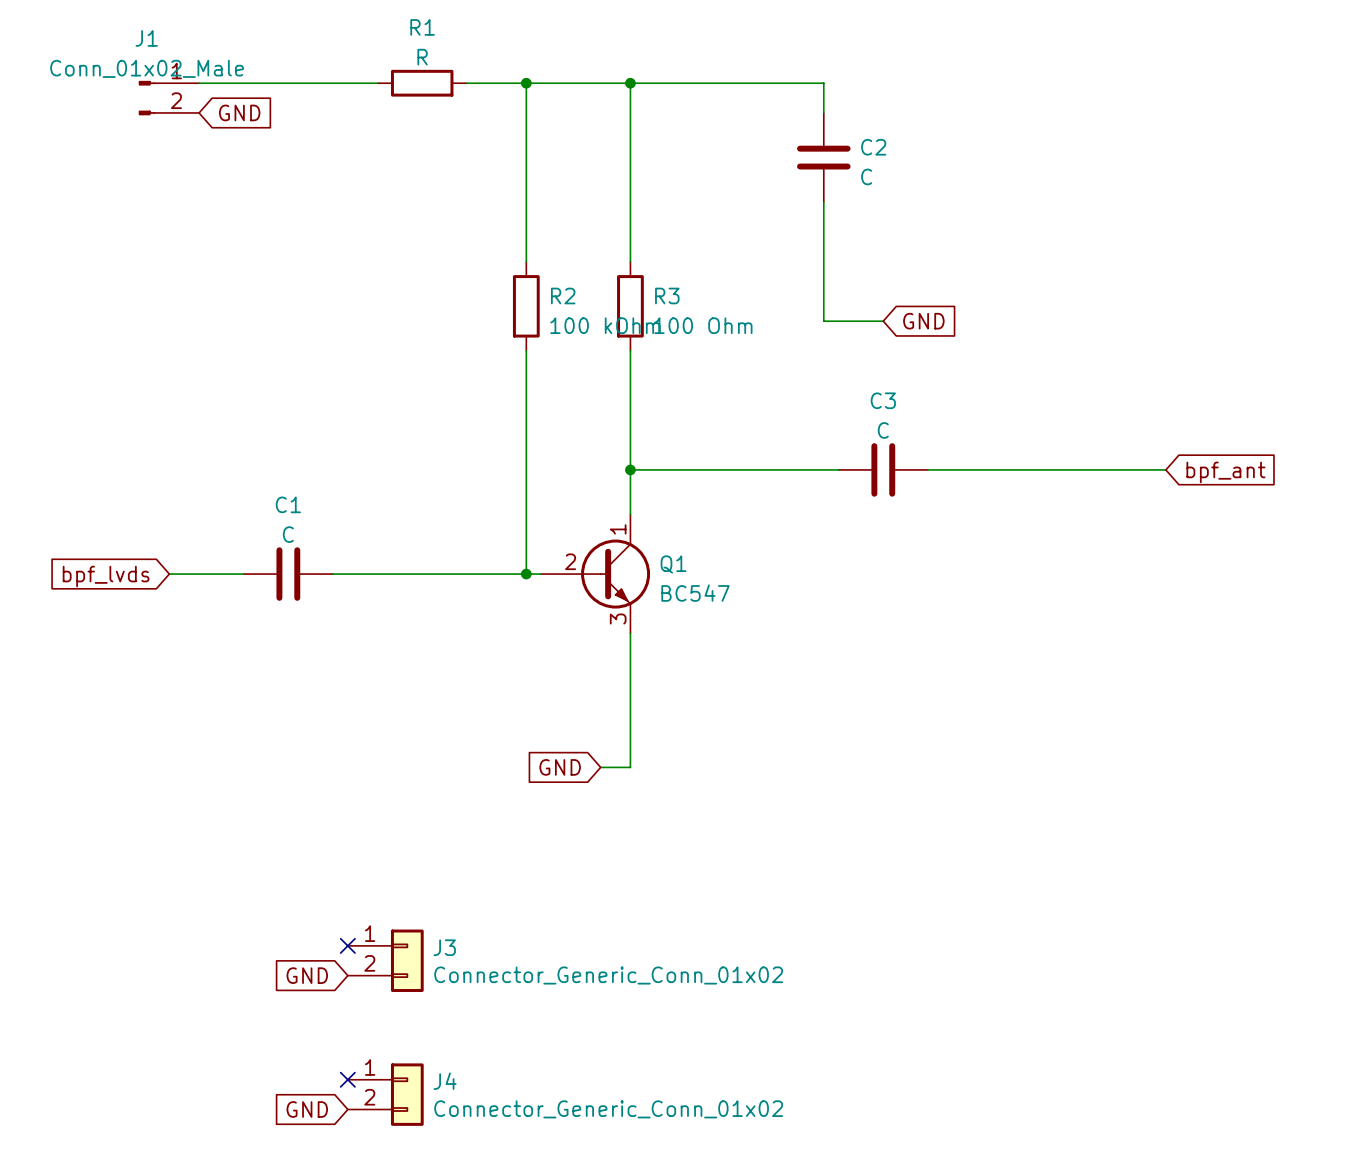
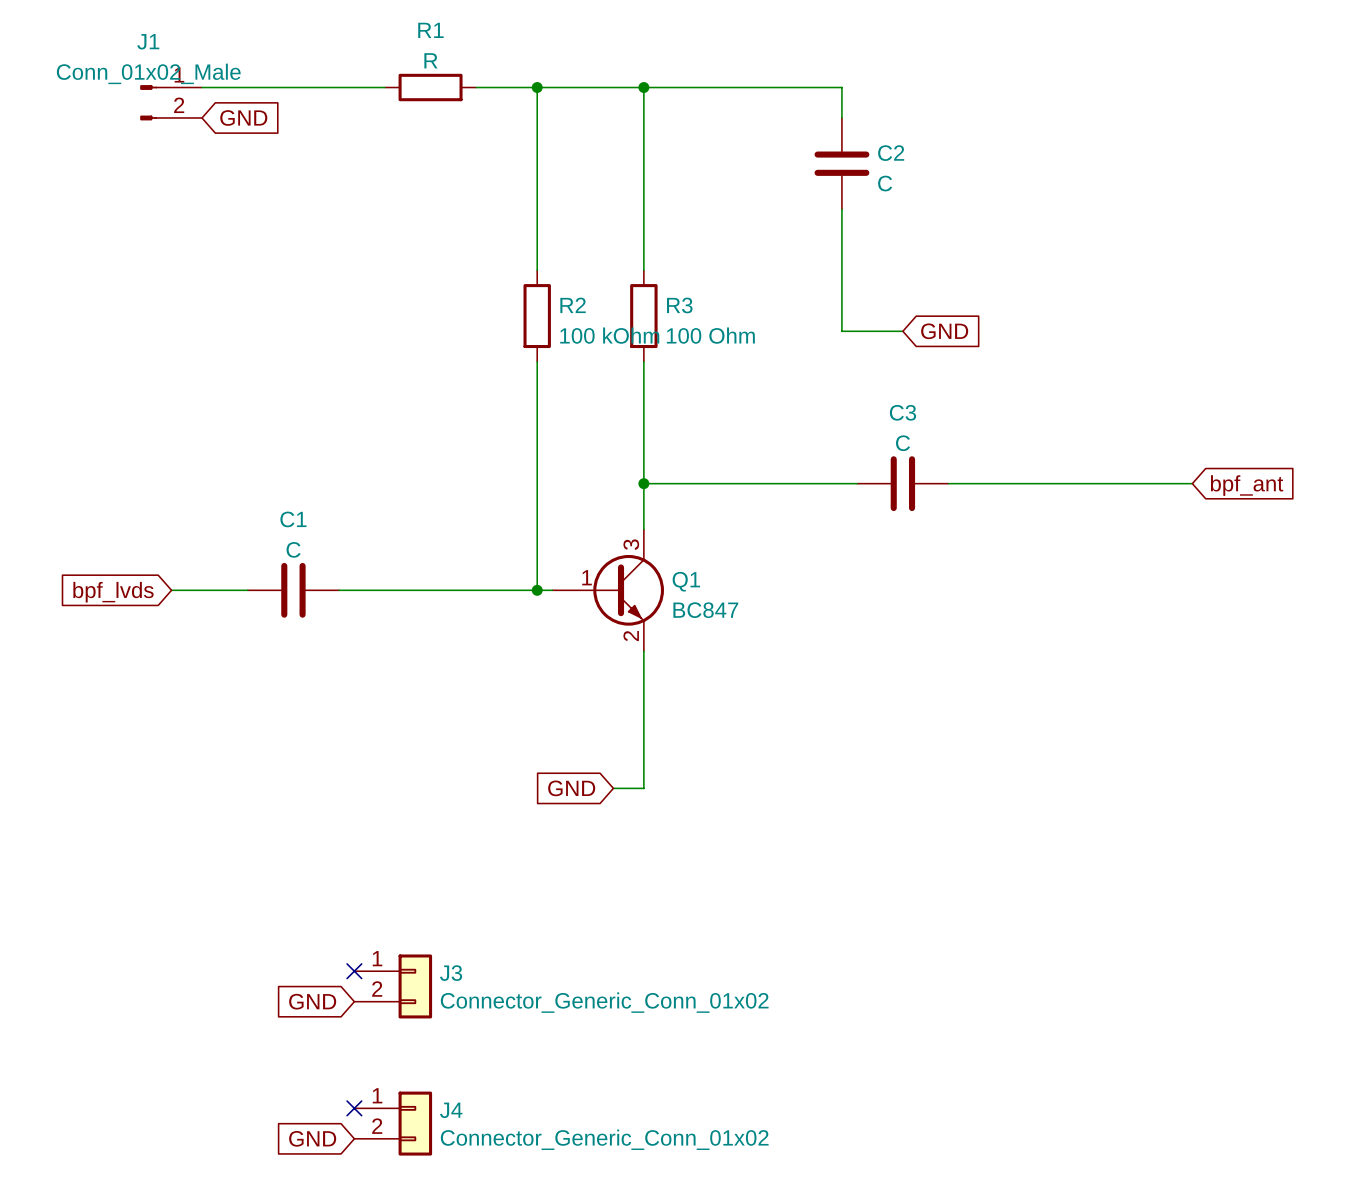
Q1 symbol: [541, 514, 651, 634] -> [552, 529, 664, 652]
Q1 value: BC547 (695, 593) -> BC847 (705, 610)

